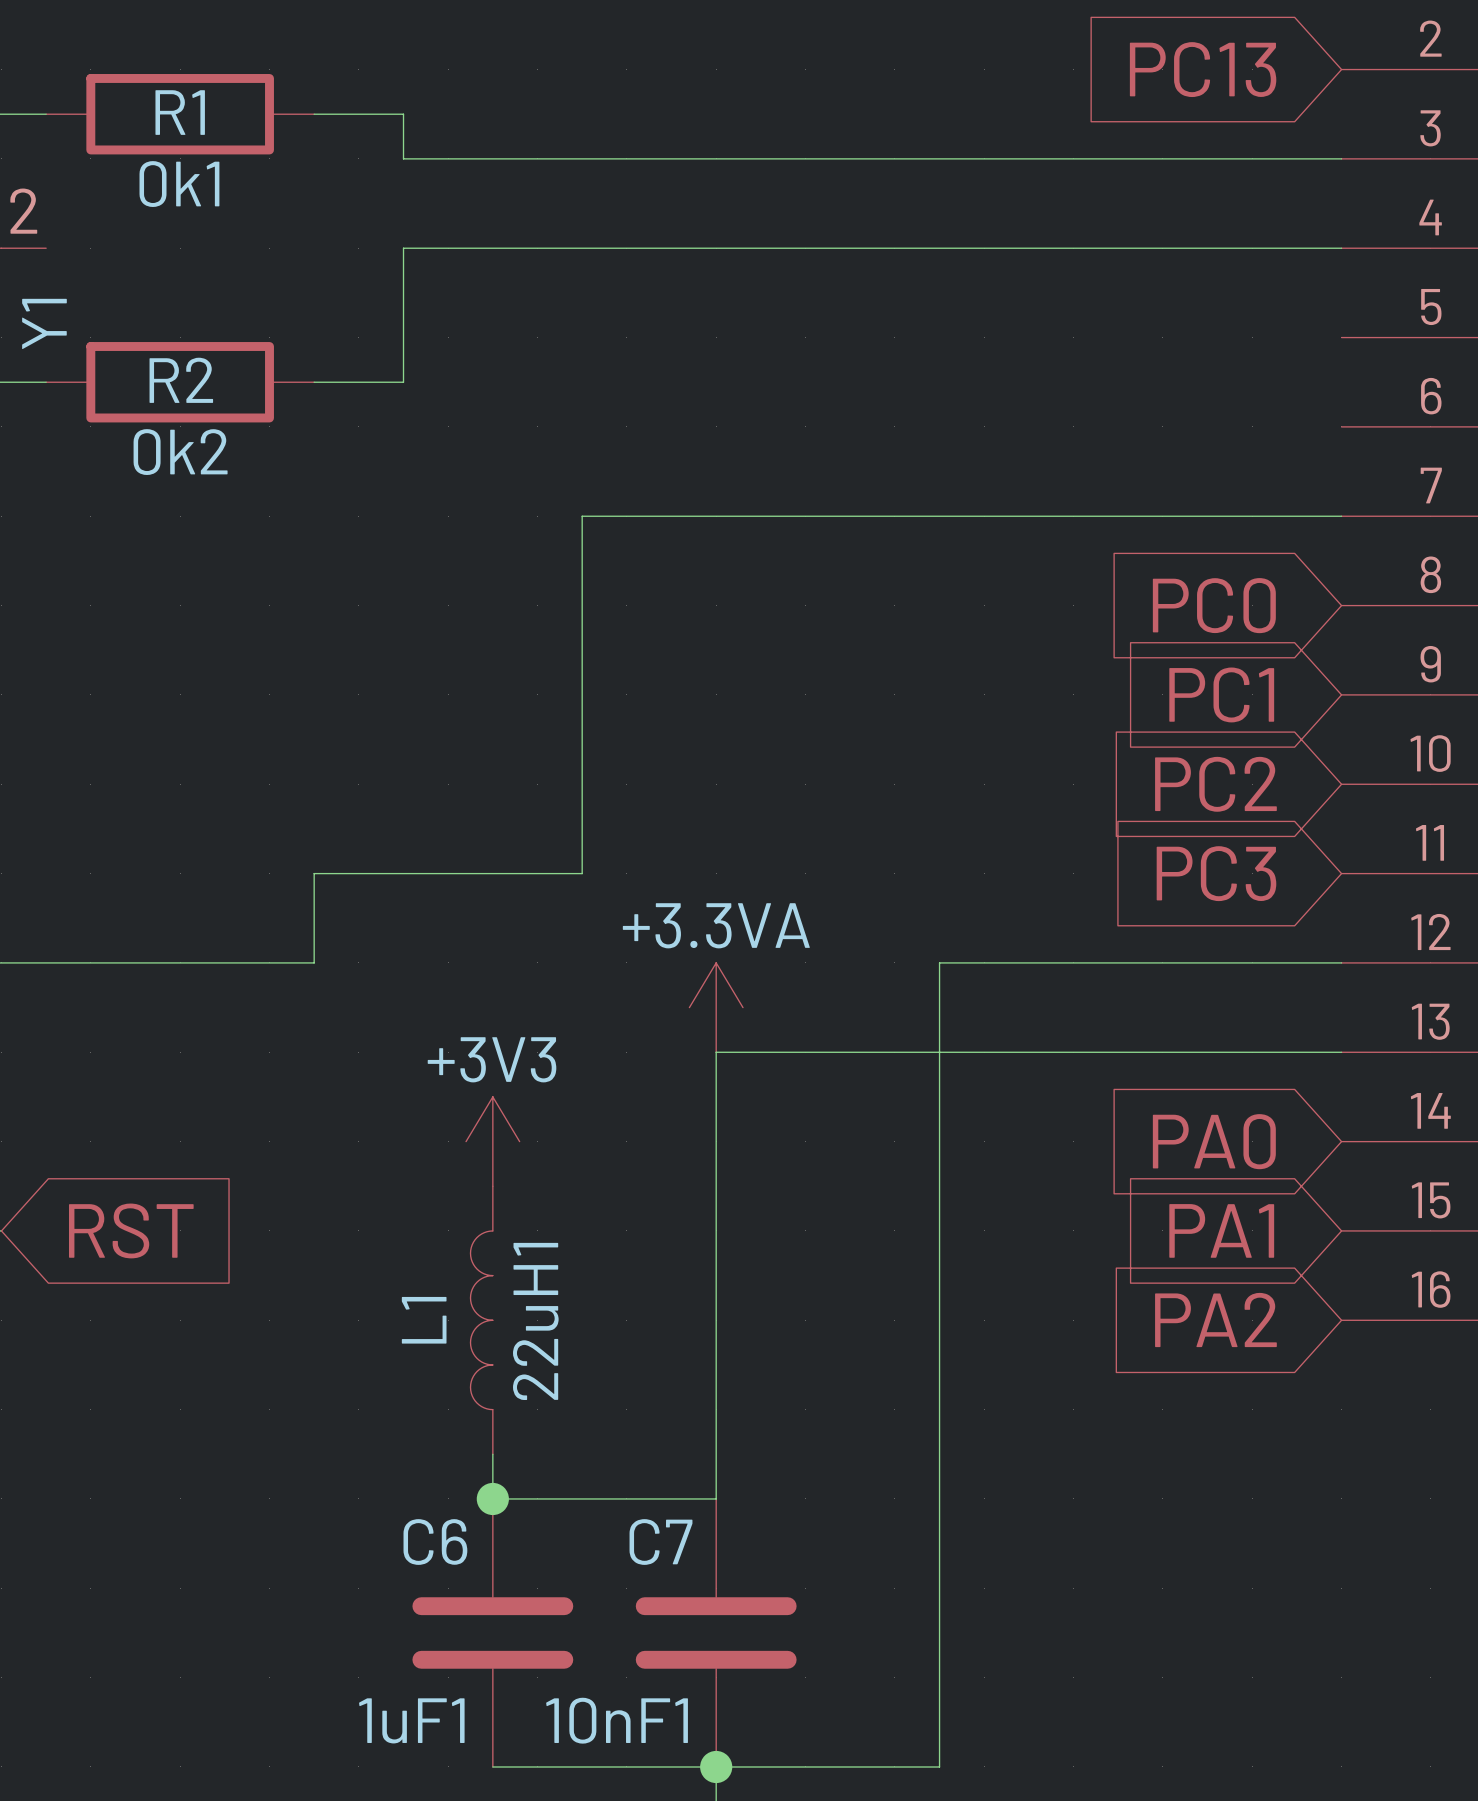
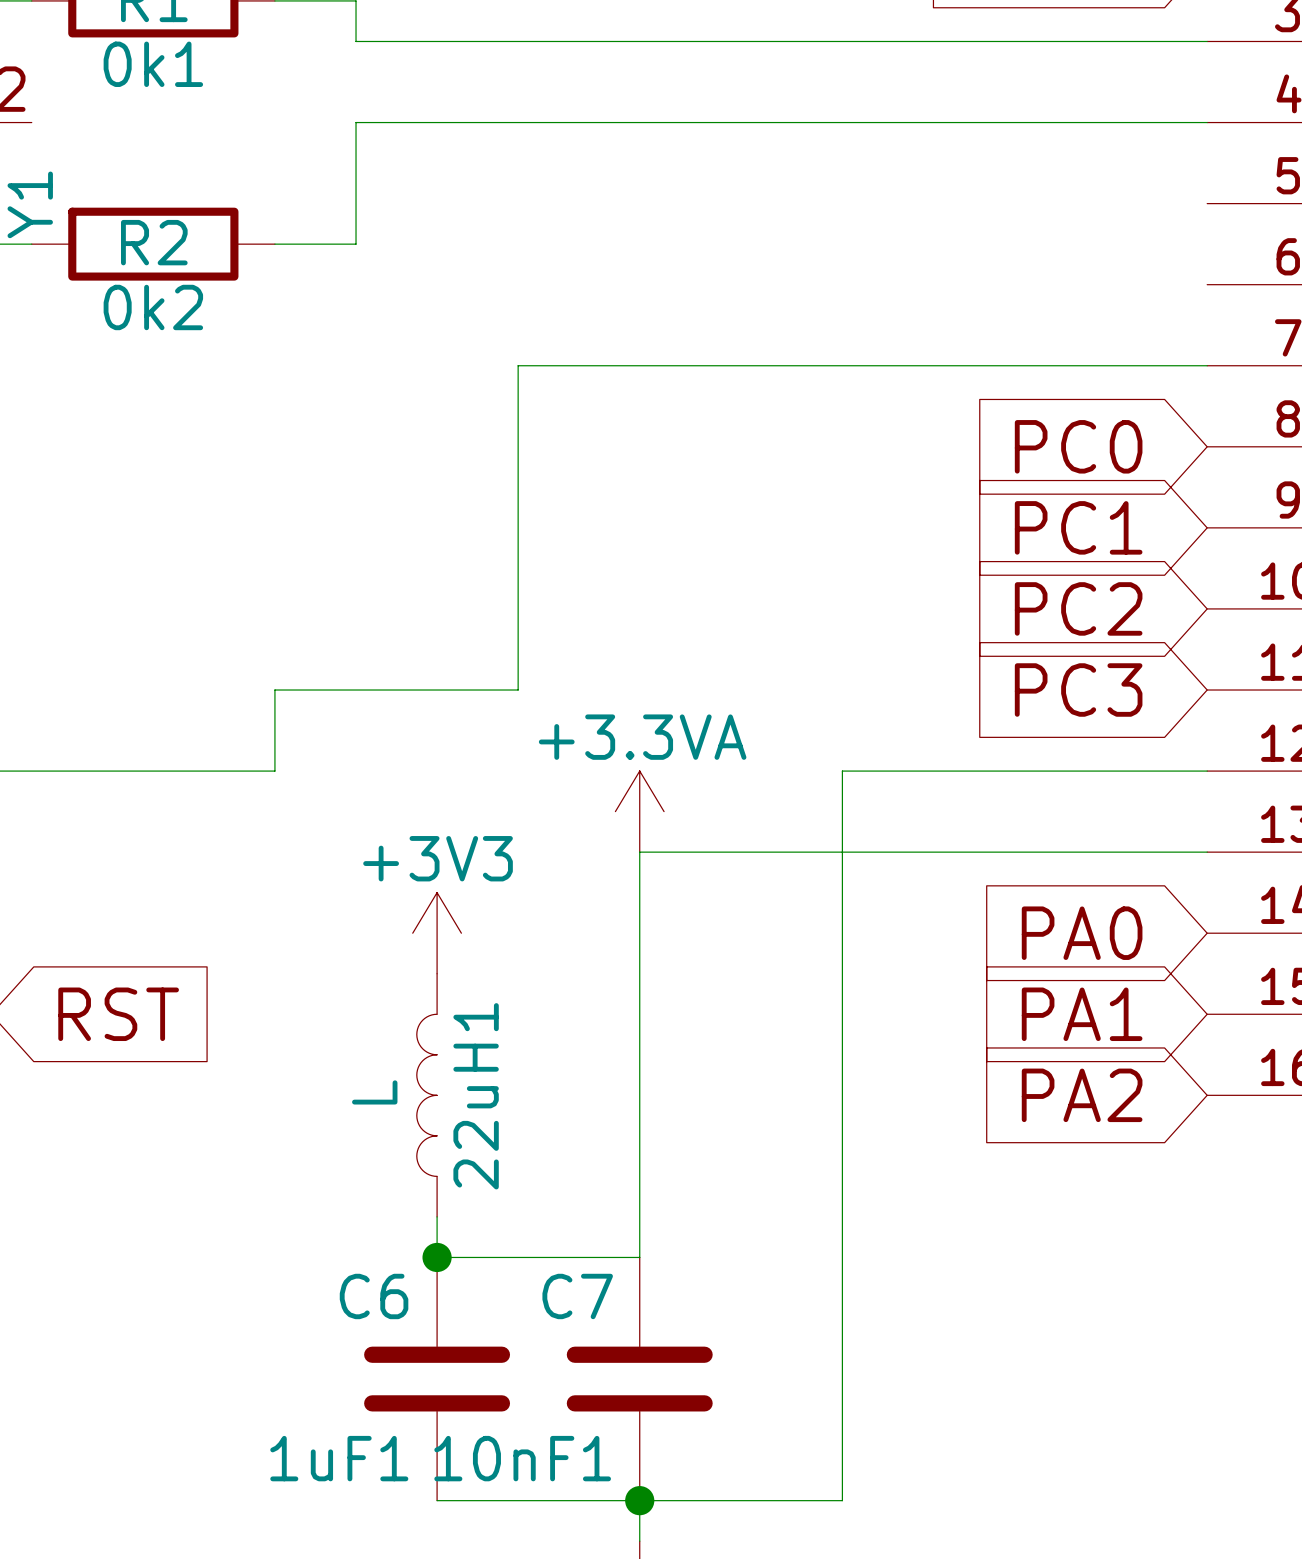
22uH1 value: L1 (424, 1320) -> L (374, 1092)

